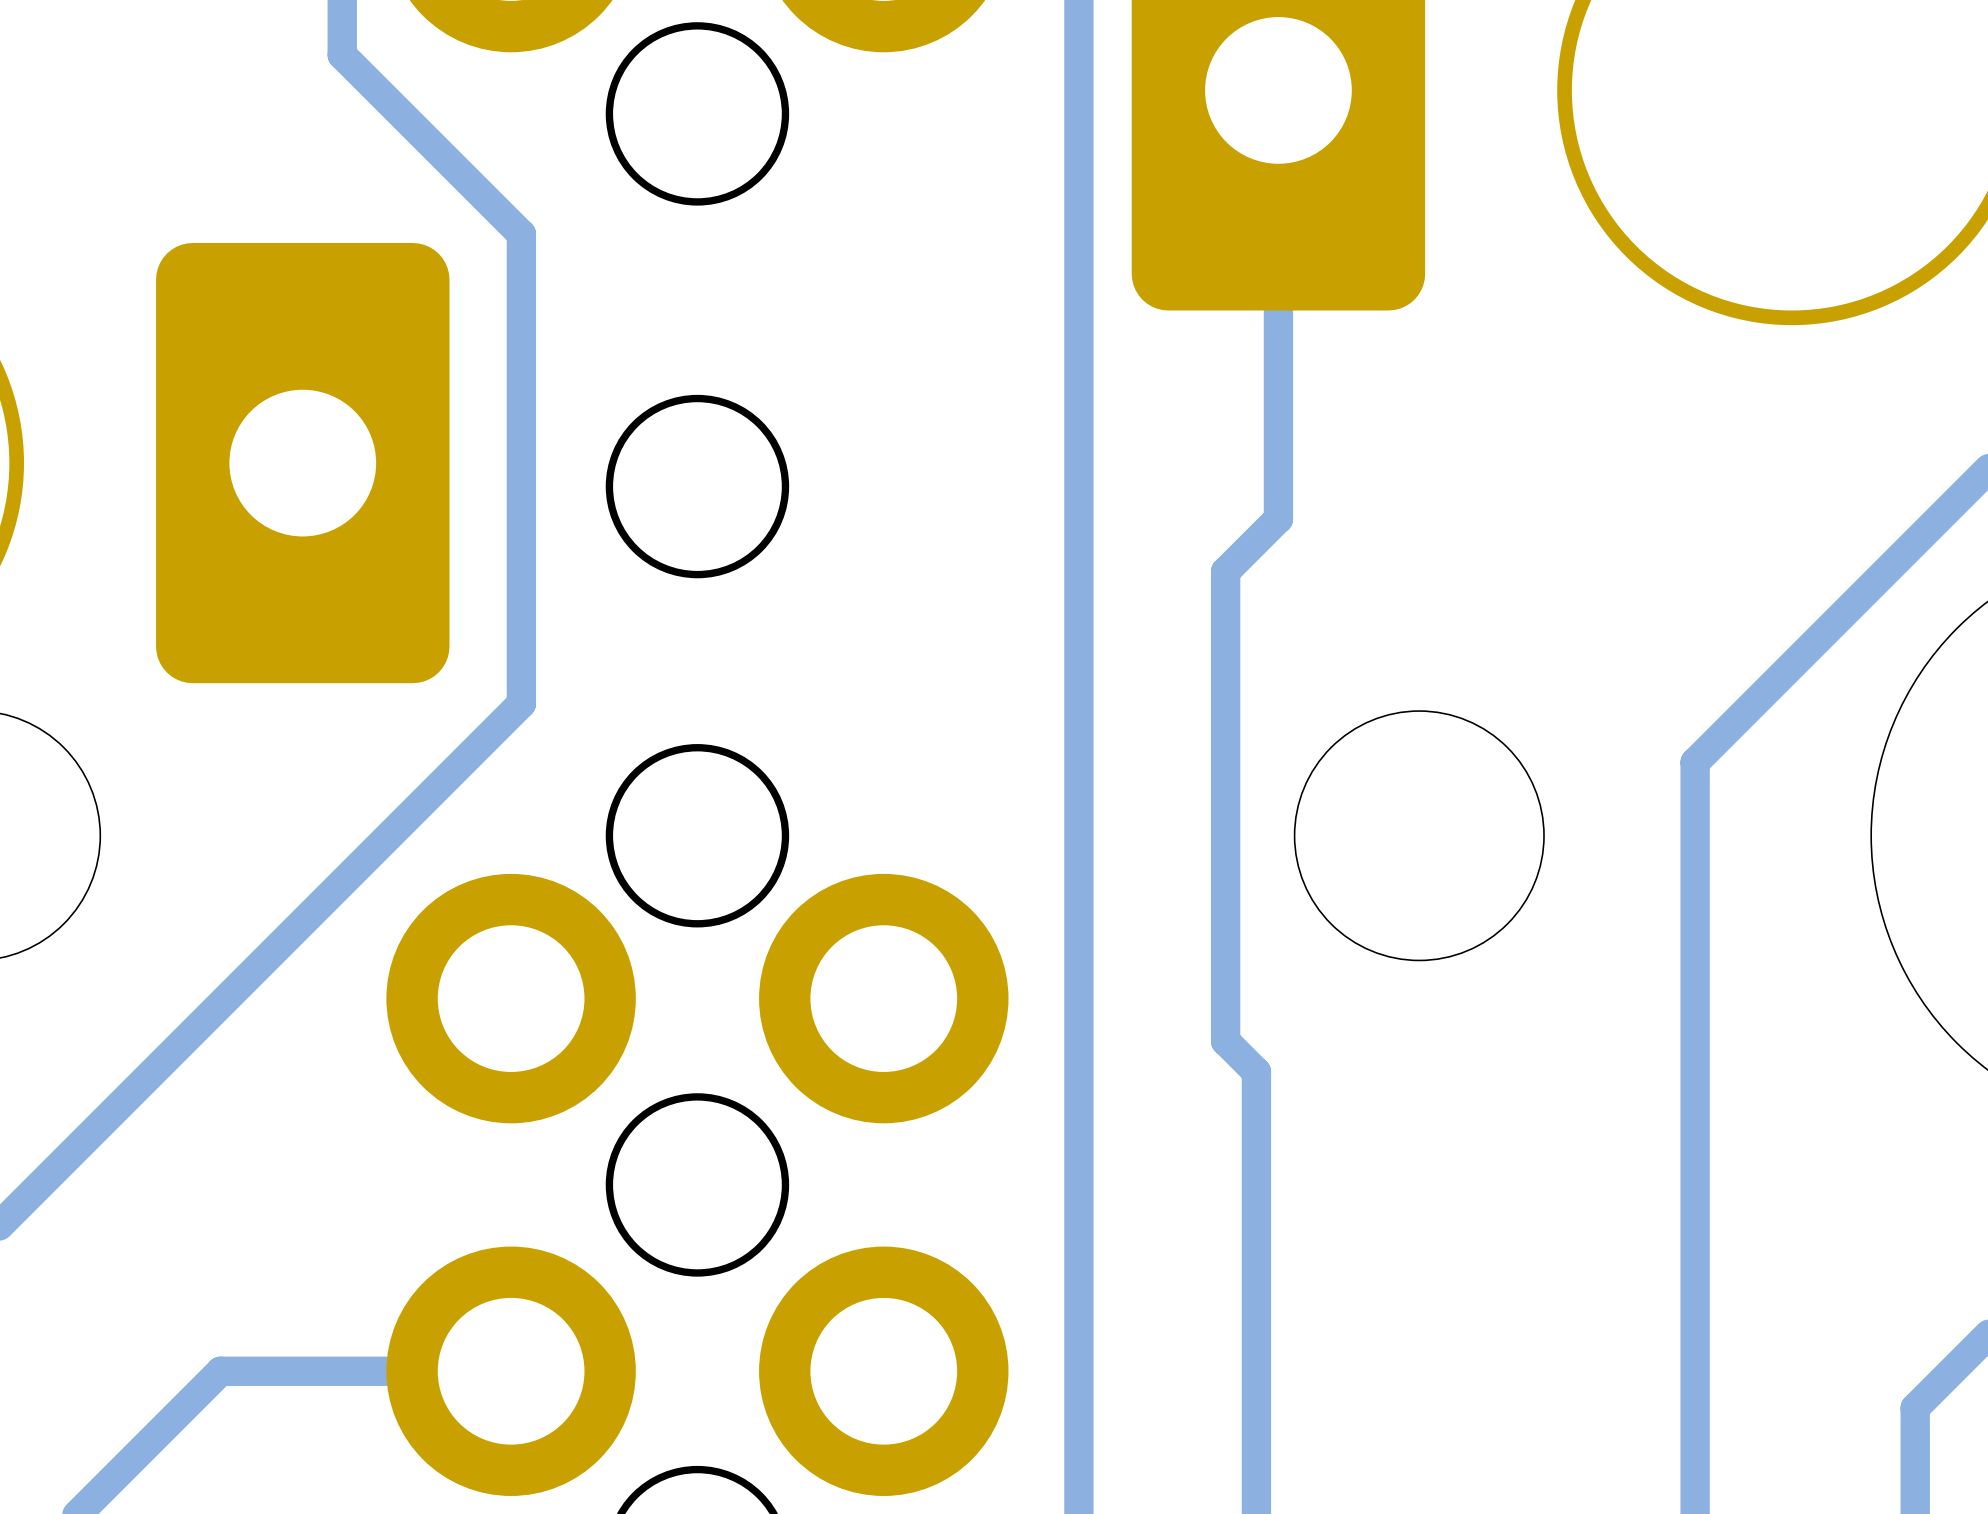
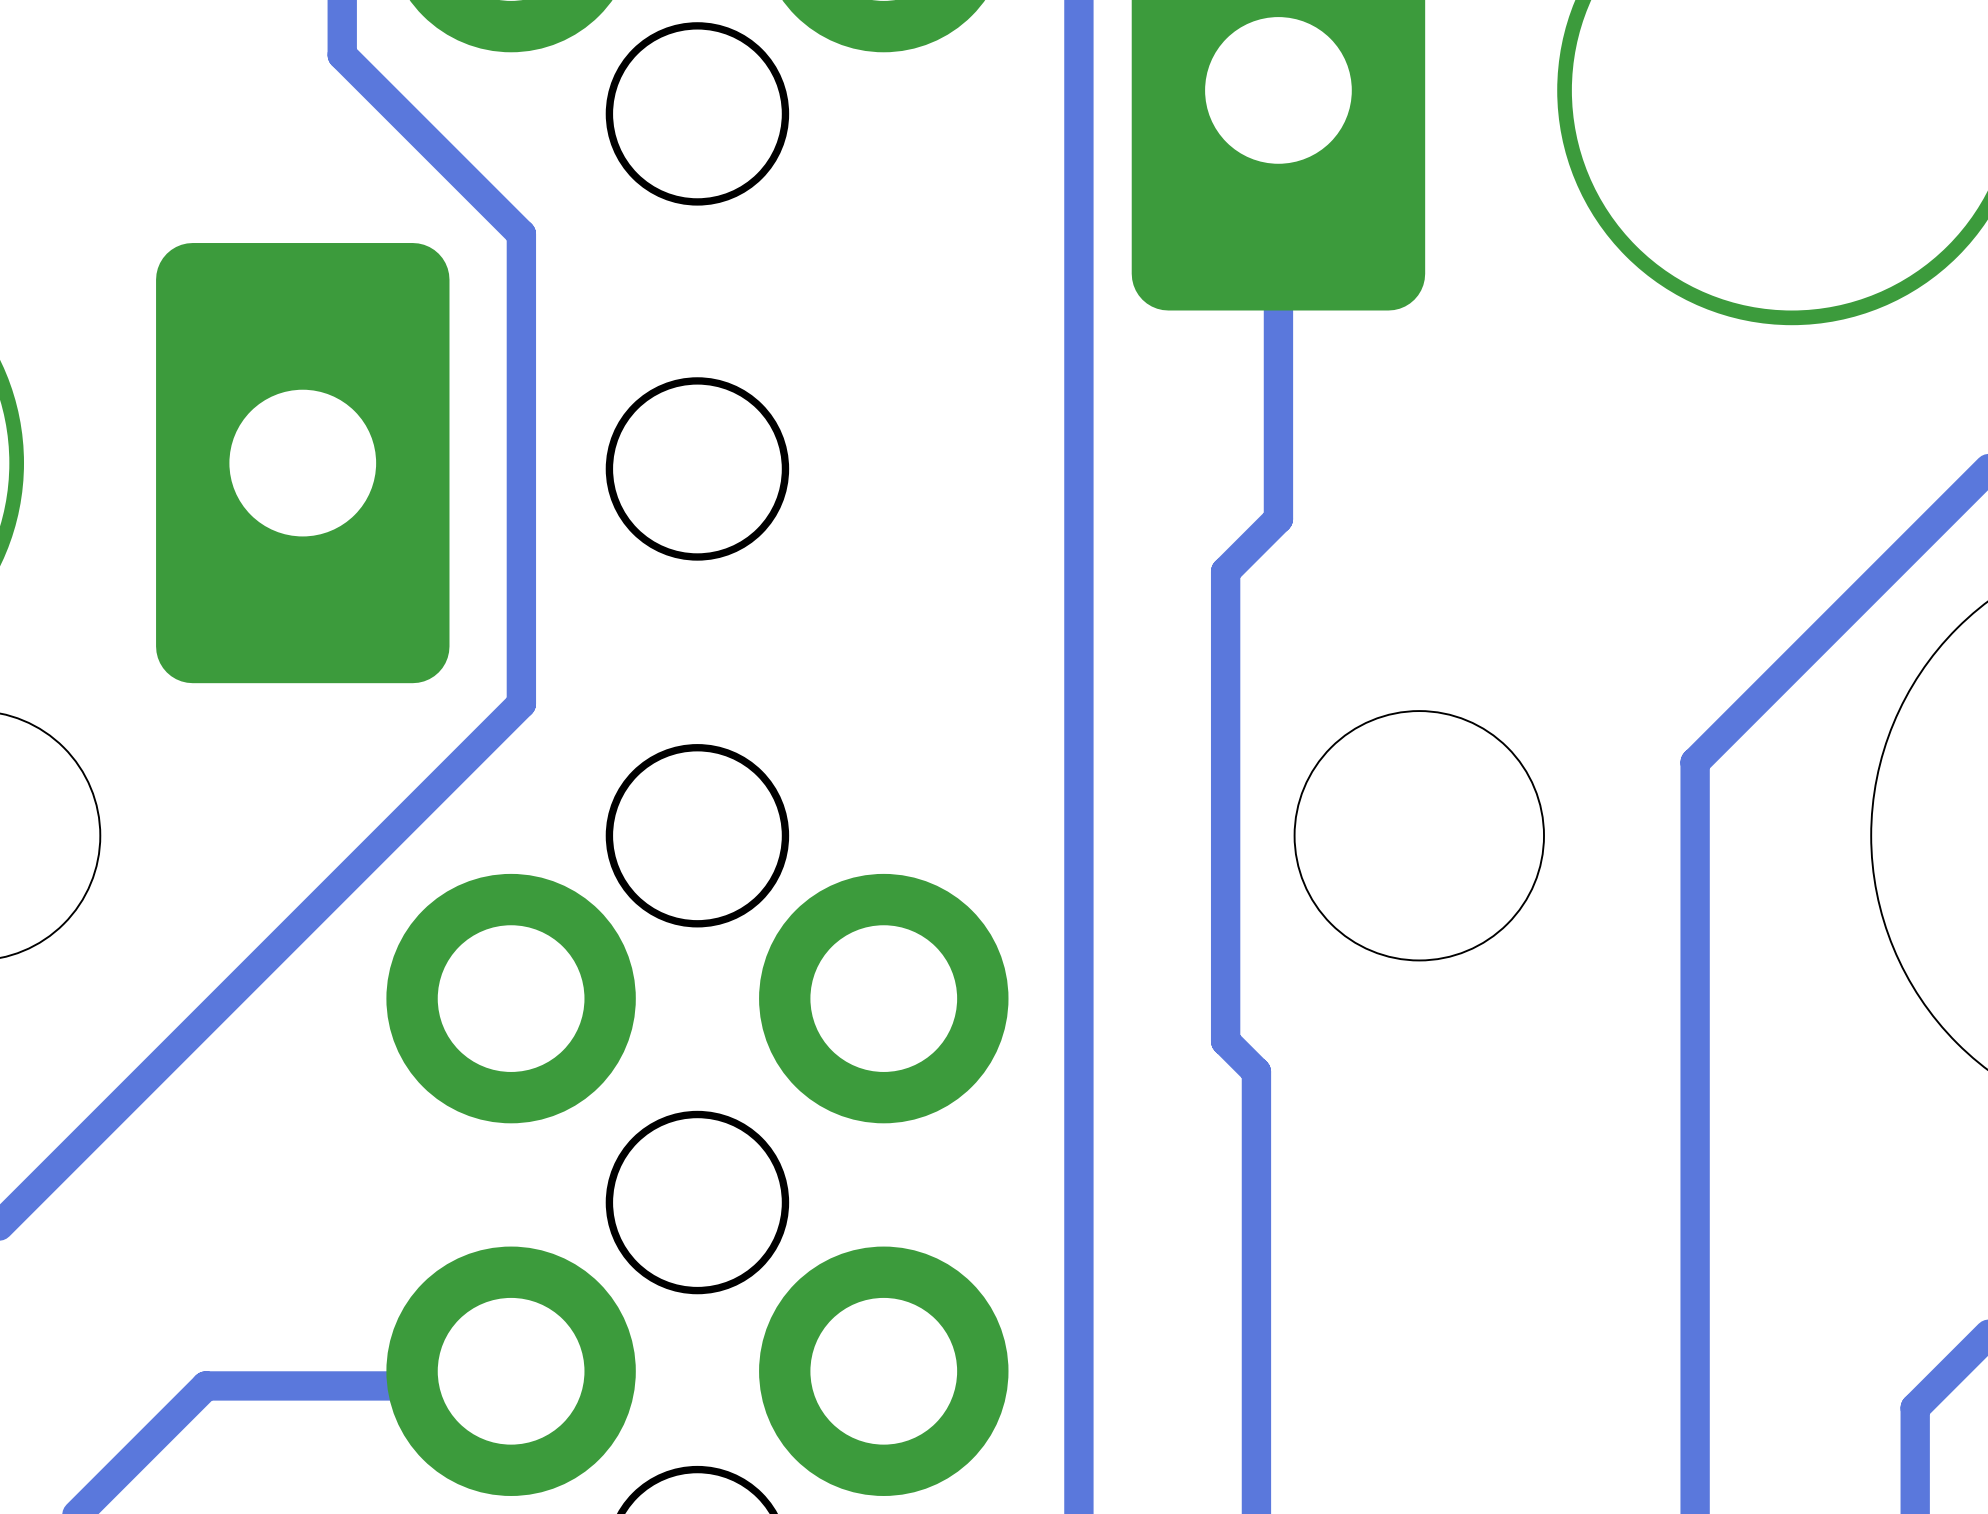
round board edge position: (697, 486) -> (697, 468)
round board edge position: (697, 1184) -> (697, 1202)
track: (511, 1371) (220, 1371) (205, 1385) -> (514, 1385) (205, 1385)

